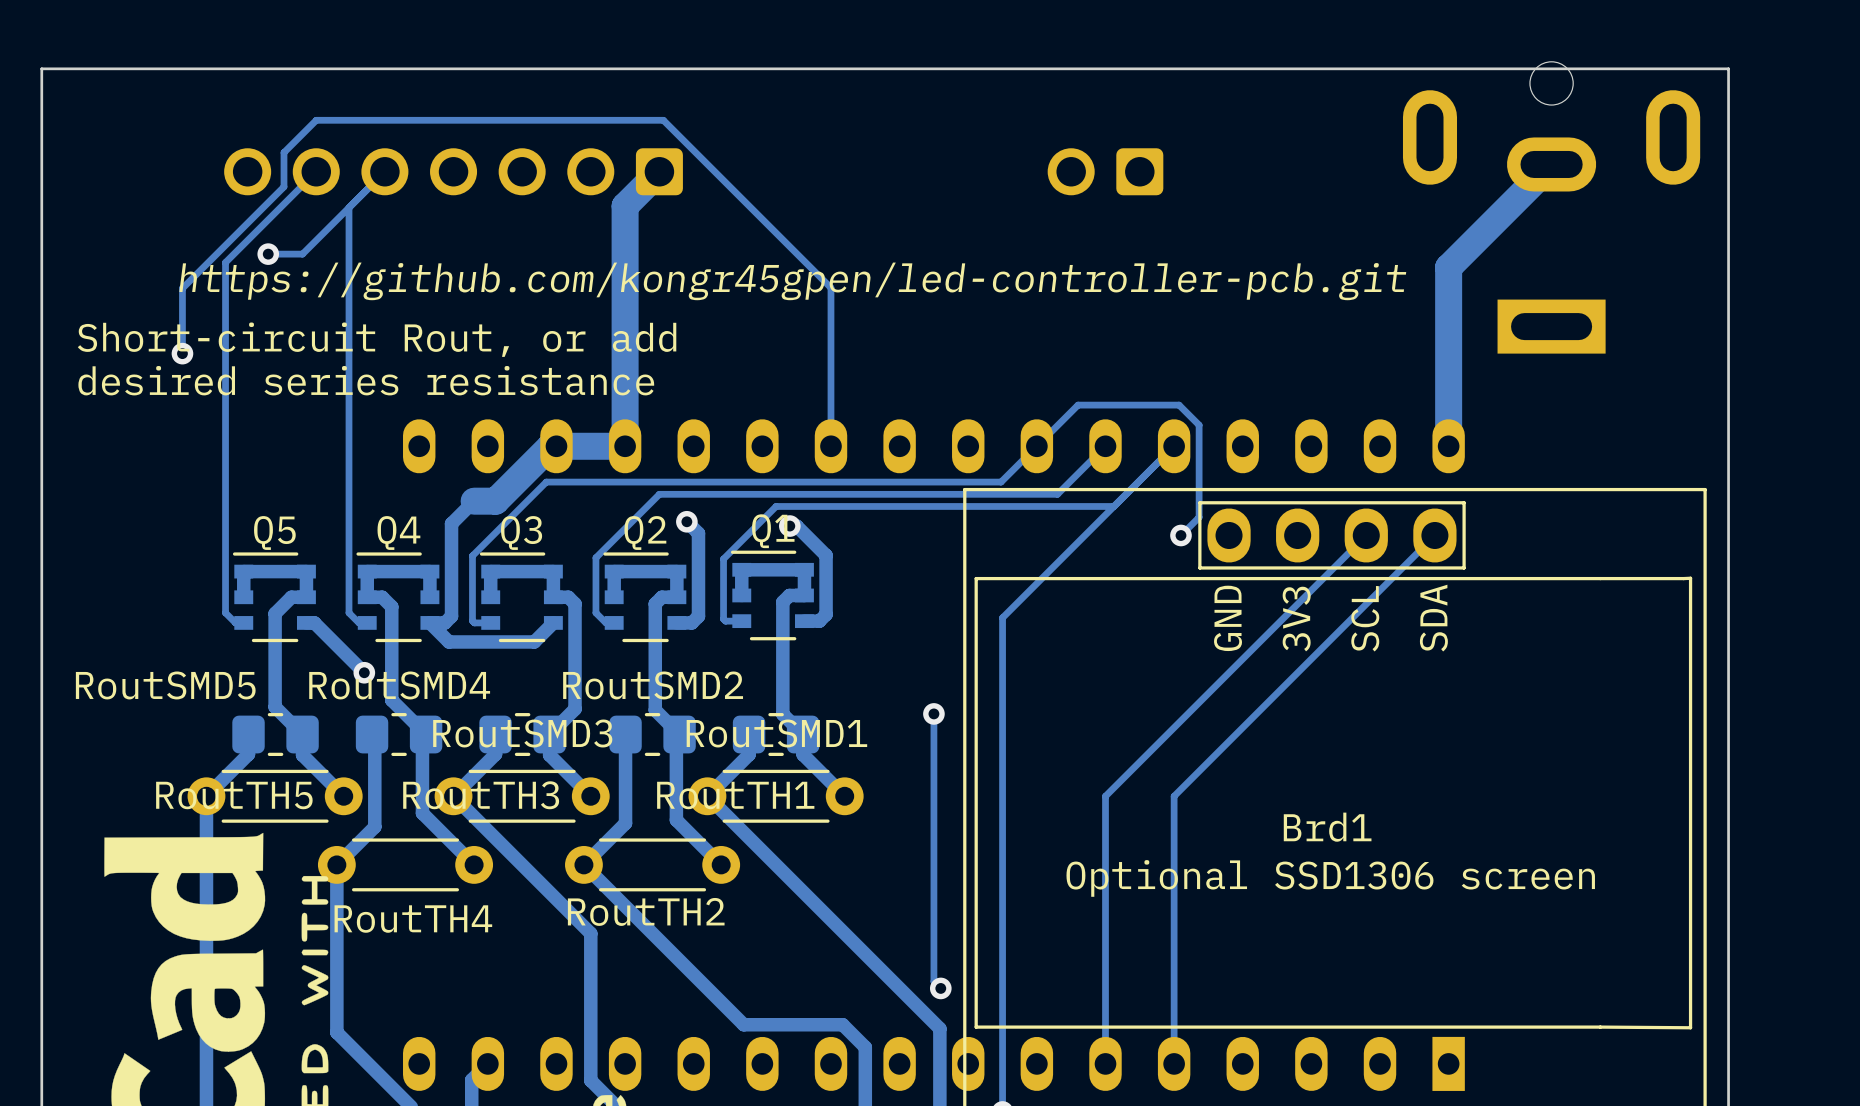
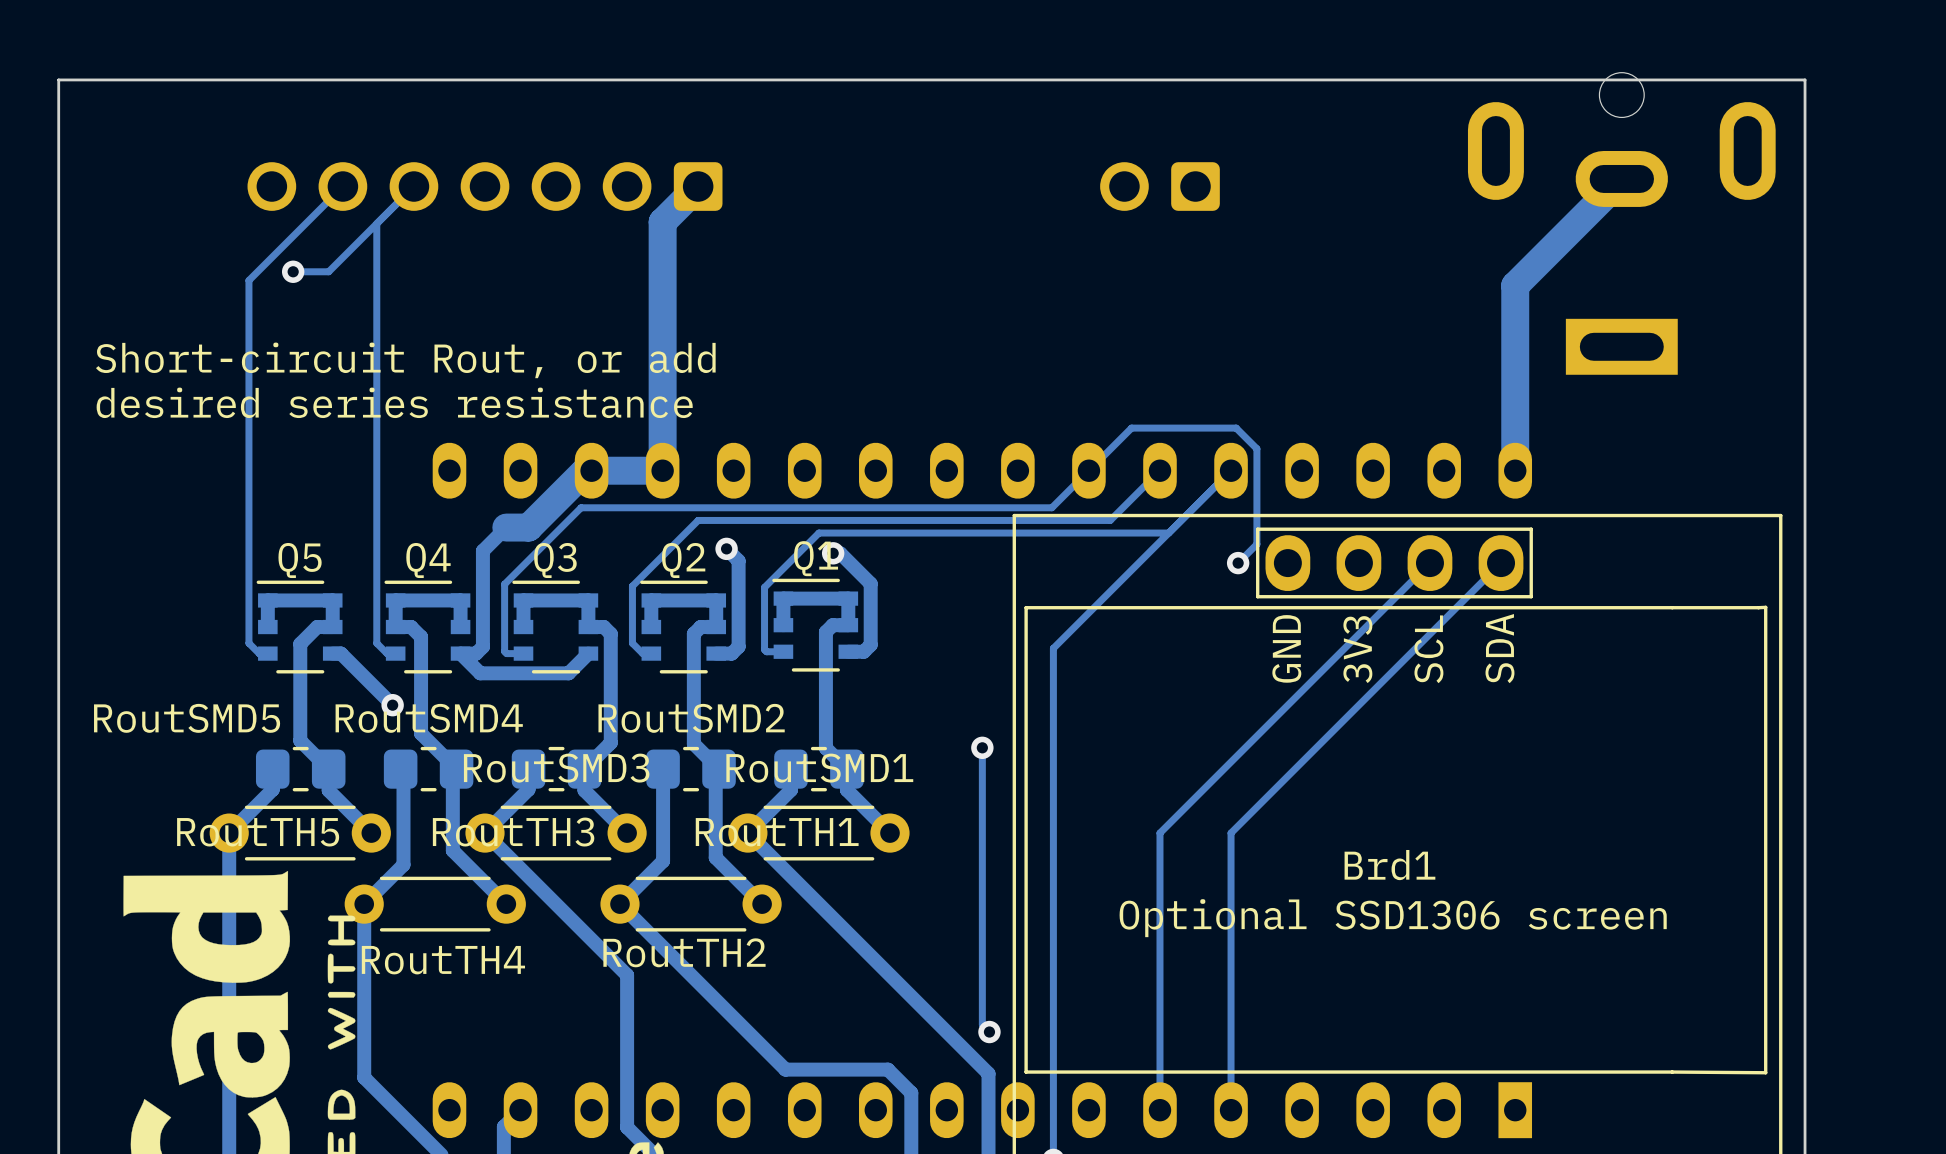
text: https://github.com/kongr45gpen/led-controller-pcb.git (792, 281) -> none
track: (182, 353) (182, 288) (283, 186) (283, 152) (316, 120) (663, 120) (830, 287) (830, 446) -> none
via: (182, 353) -> none

